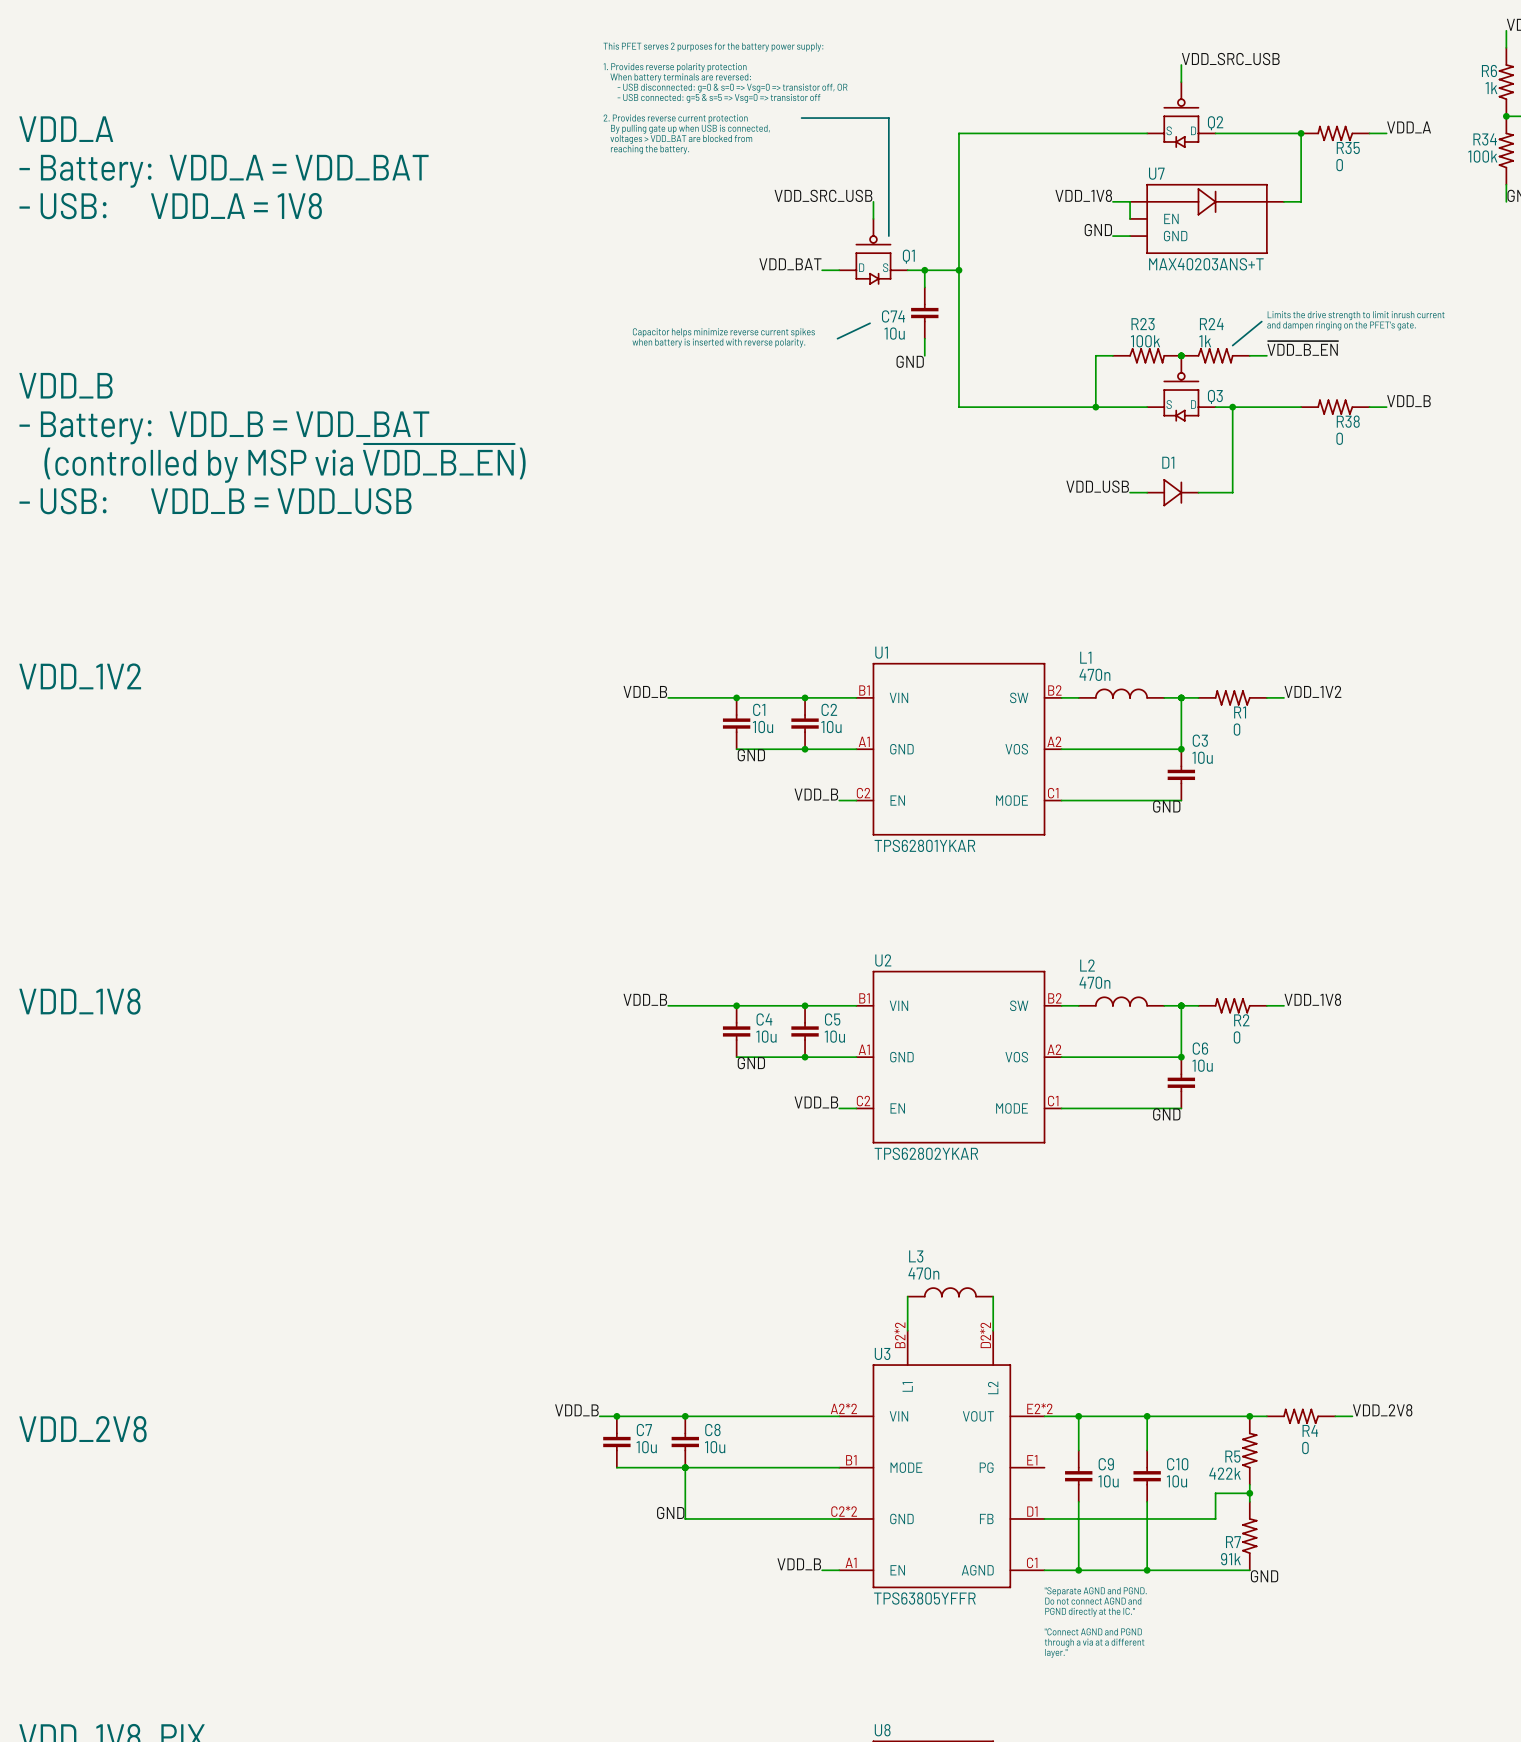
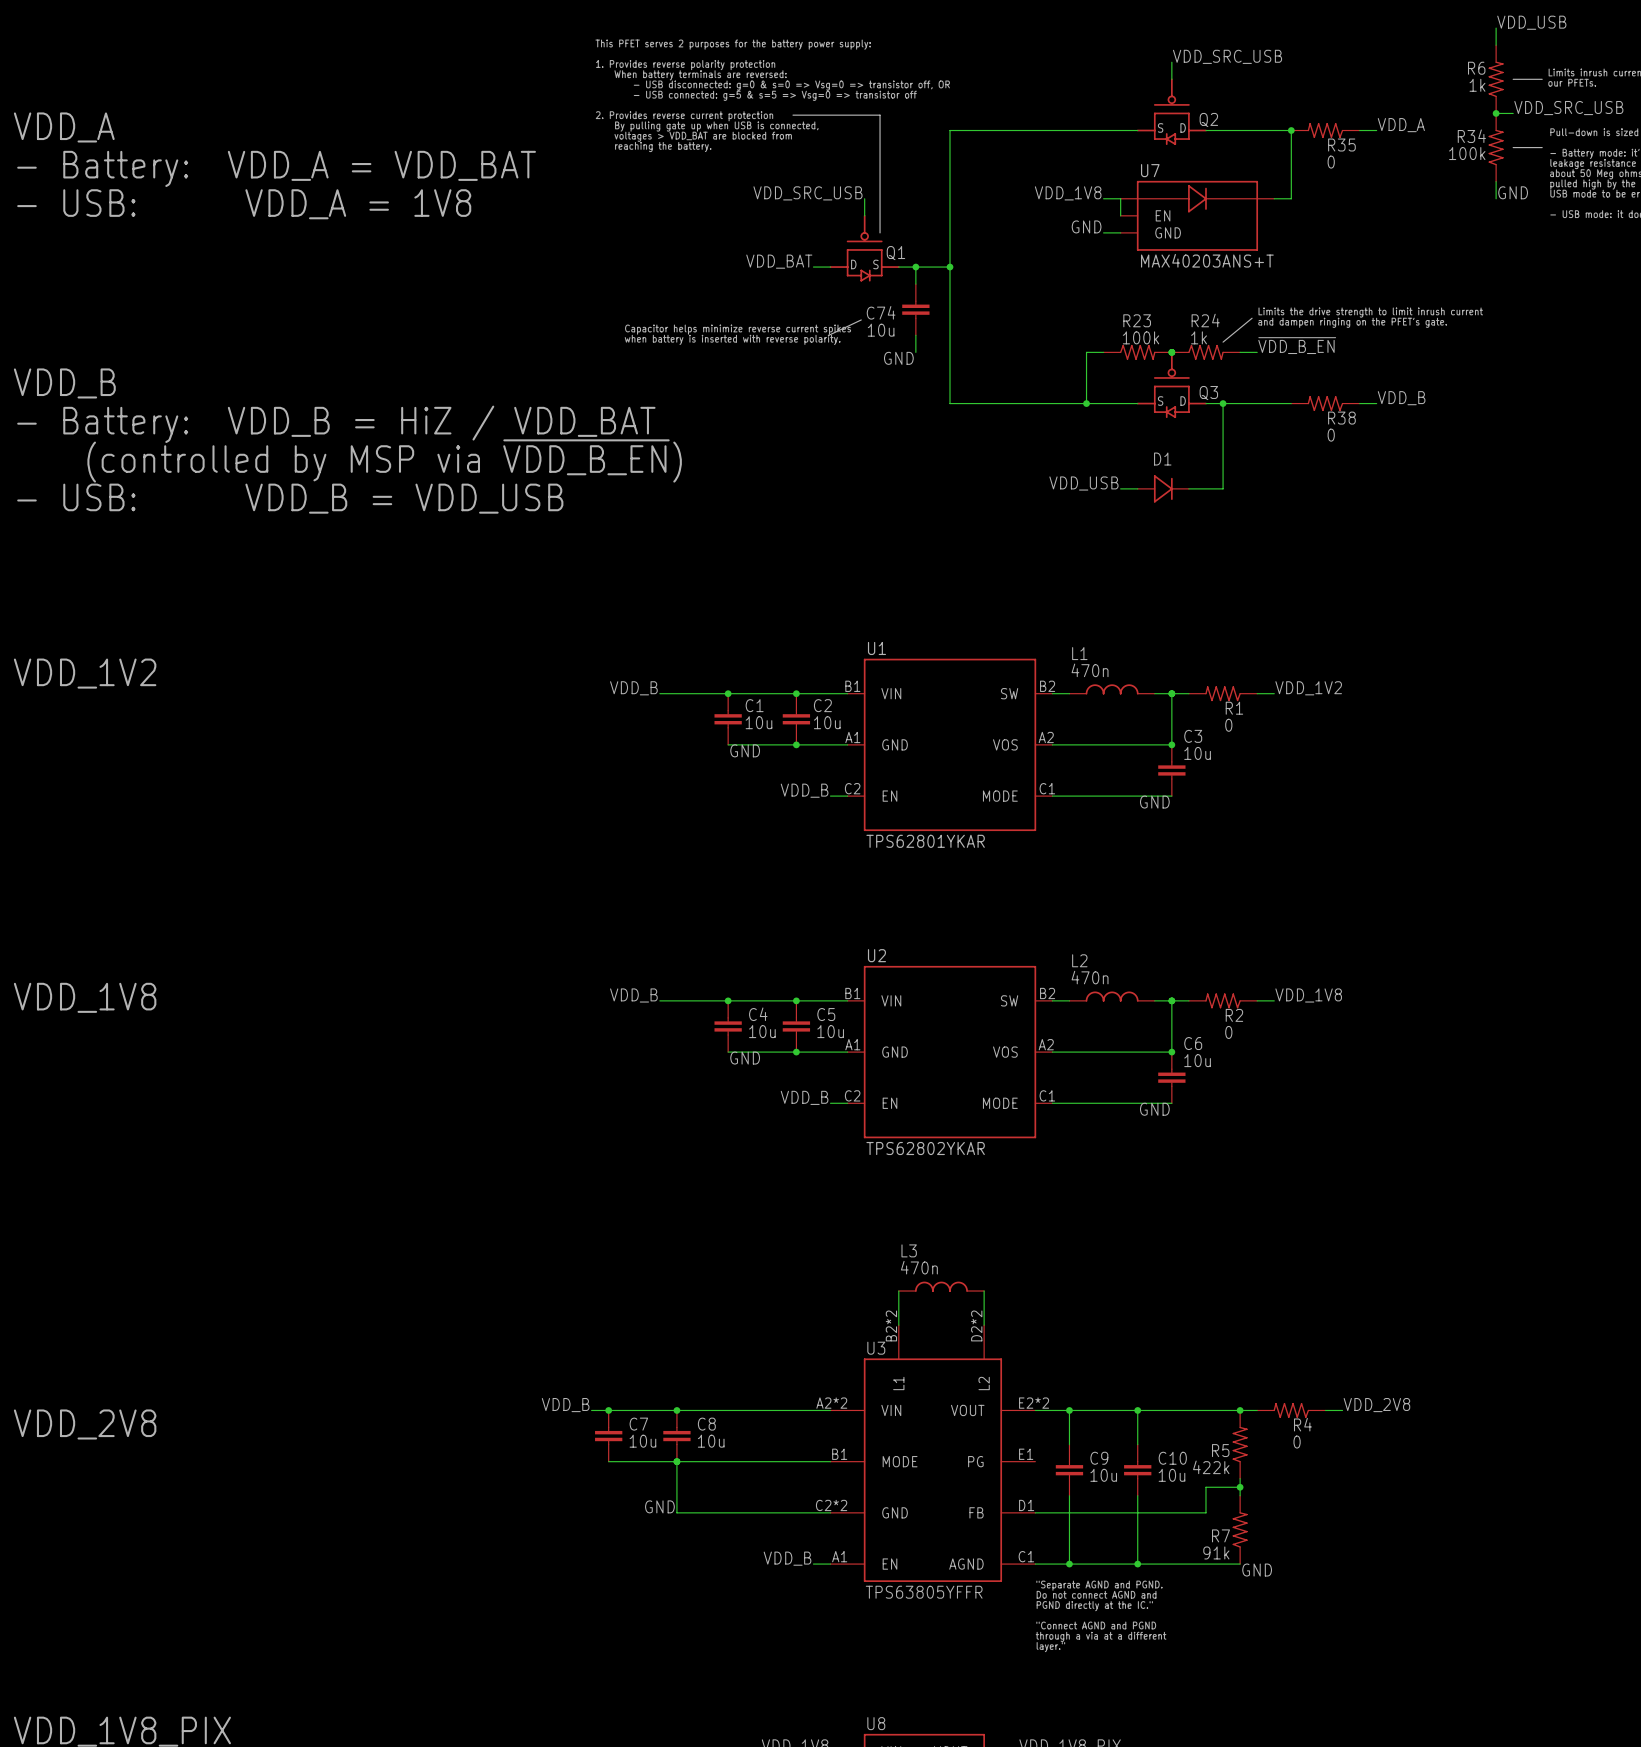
text: - Battery: VDD_B = VDD_BAT (224, 427) -> - Battery: VDD_B = HiZ / VDD_BAT (336, 424)

